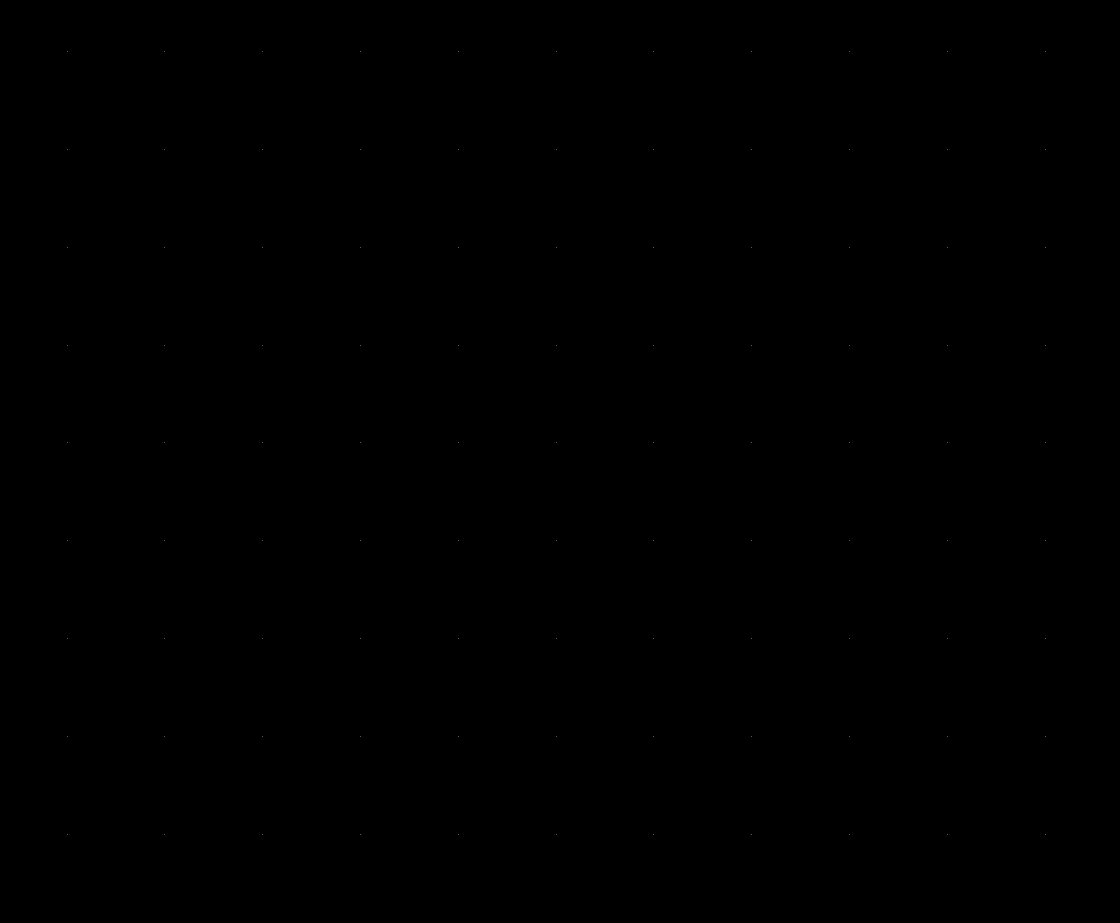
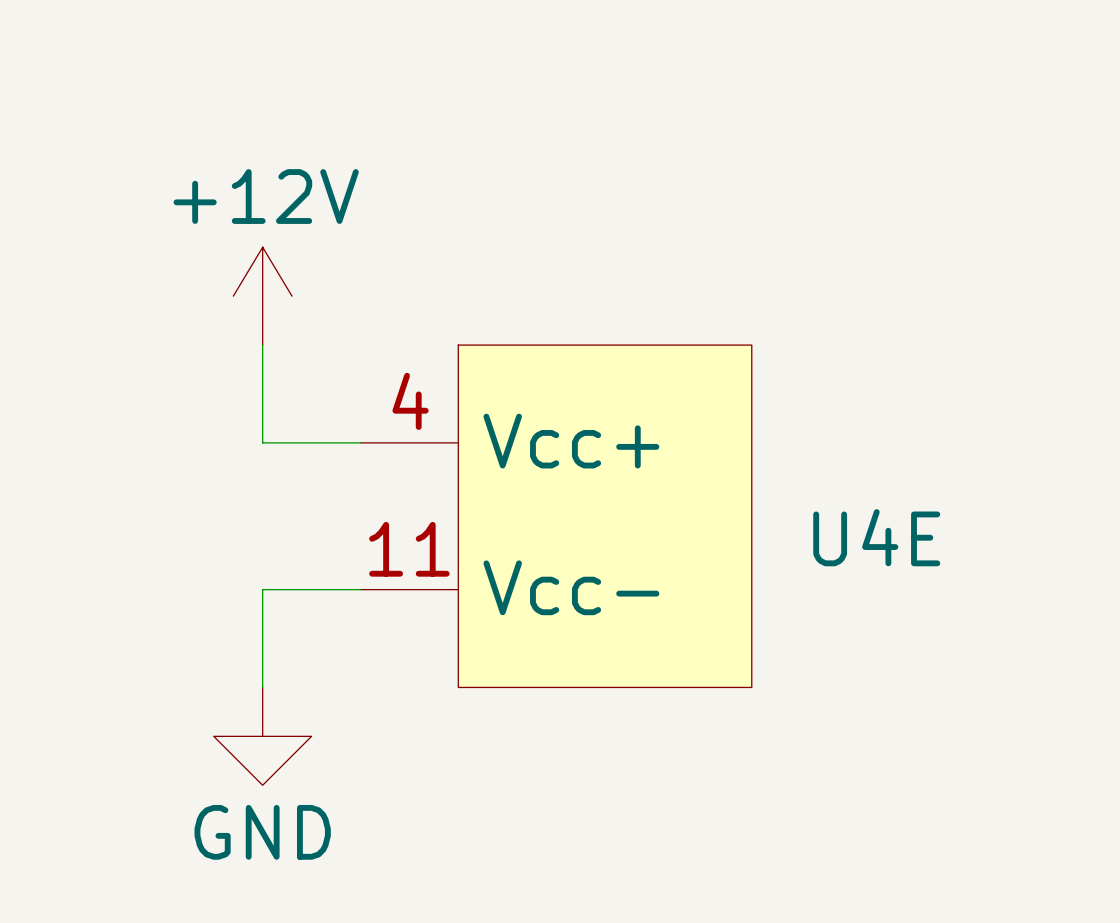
power symbol: none -> +12V (262, 296)
wire: none -> (262, 345) (262, 442) (360, 442)
U4E: none -> (556, 516)
wire: none -> (360, 589) (262, 589) (262, 687)
power symbol: none -> GND (262, 736)

